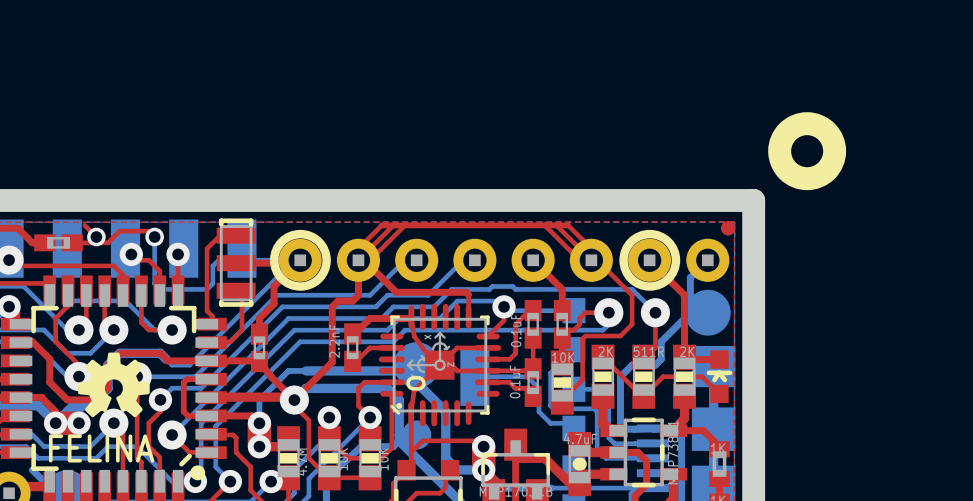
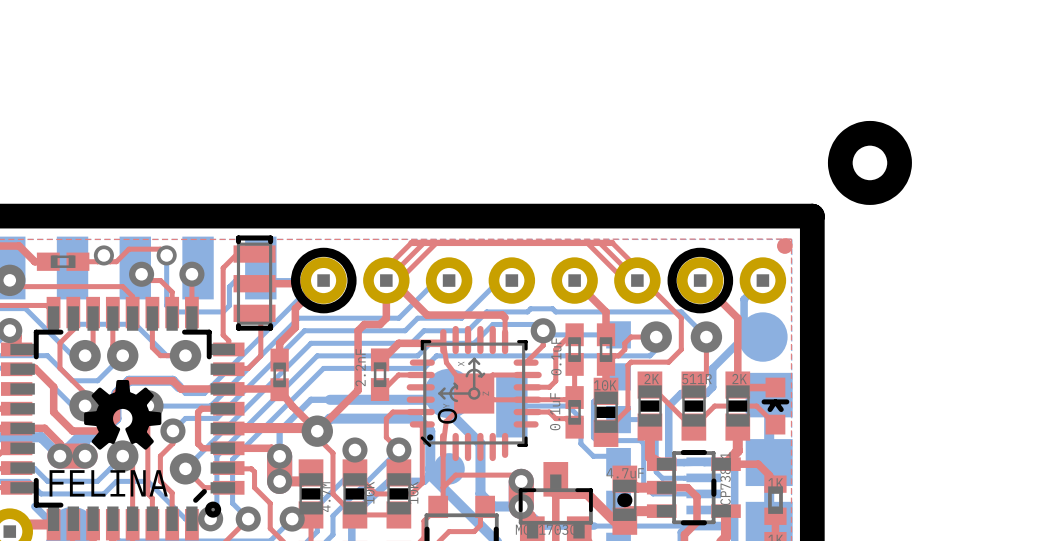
top track: (84, 225) (96, 237) -> none
part footprint: [378, 303, 502, 427] -> [406, 325, 542, 462]

